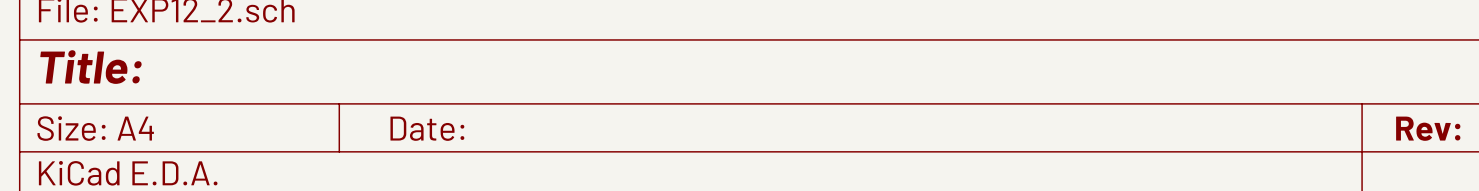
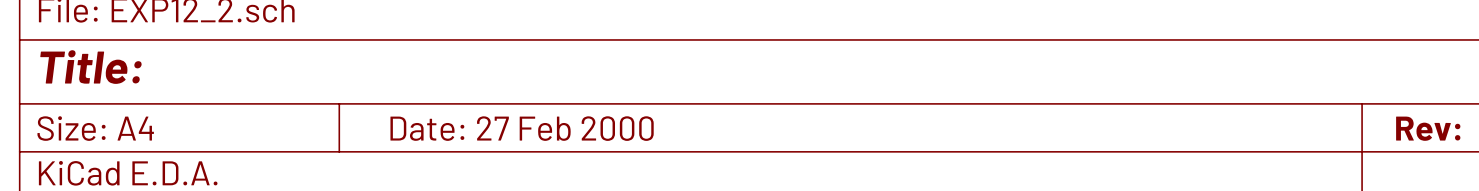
title block: Date: (427, 128) -> Date: 27 Feb 2000 (522, 128)

